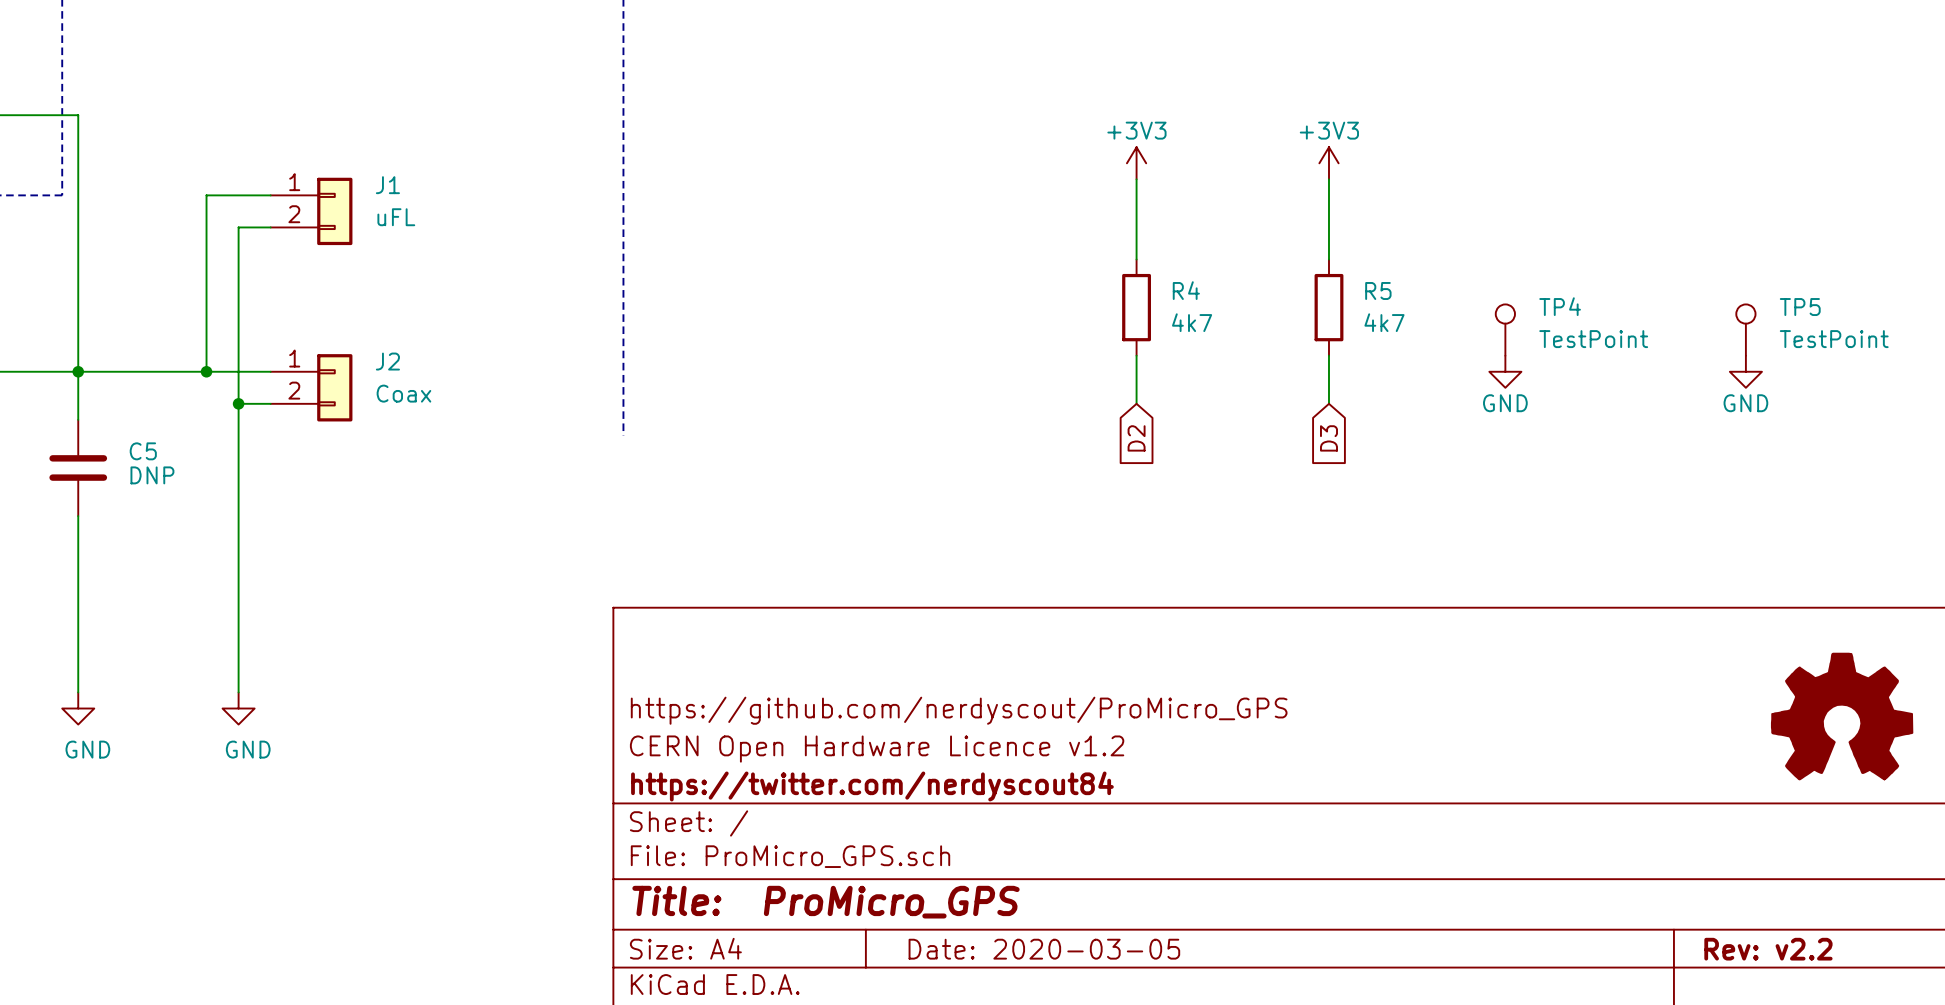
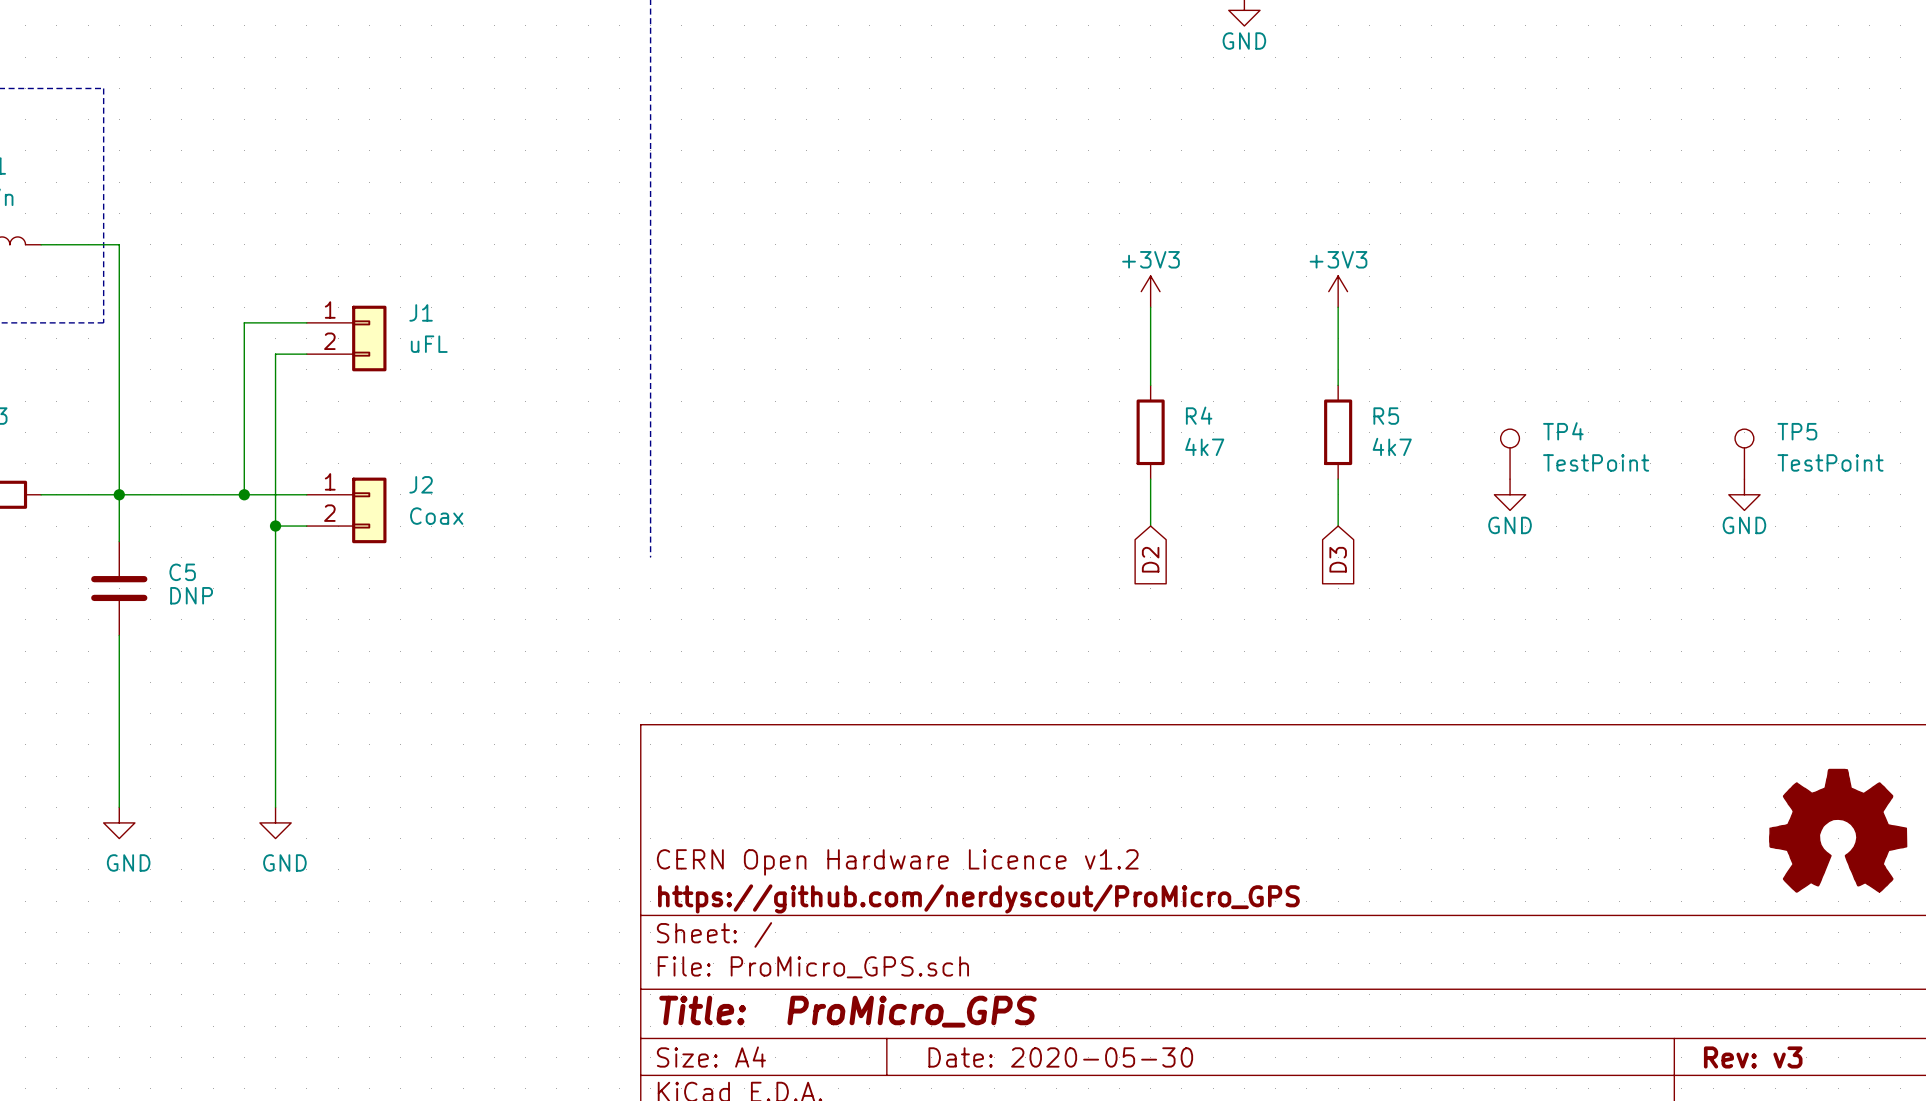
title block: https://github.com/nerdyscout/ProMicro_GPS (959, 710) -> none
title block: https://twitter.com/nerdyscout84 (872, 786) -> https://github.com/nerdyscout/ProMicro_GPS (978, 898)
title block: Date: 2020-03-05 (1044, 949) -> Date: 2020-05-30 (1060, 1057)
title block: Rev: v2.2 (1768, 949) -> Rev: v3 (1753, 1057)

